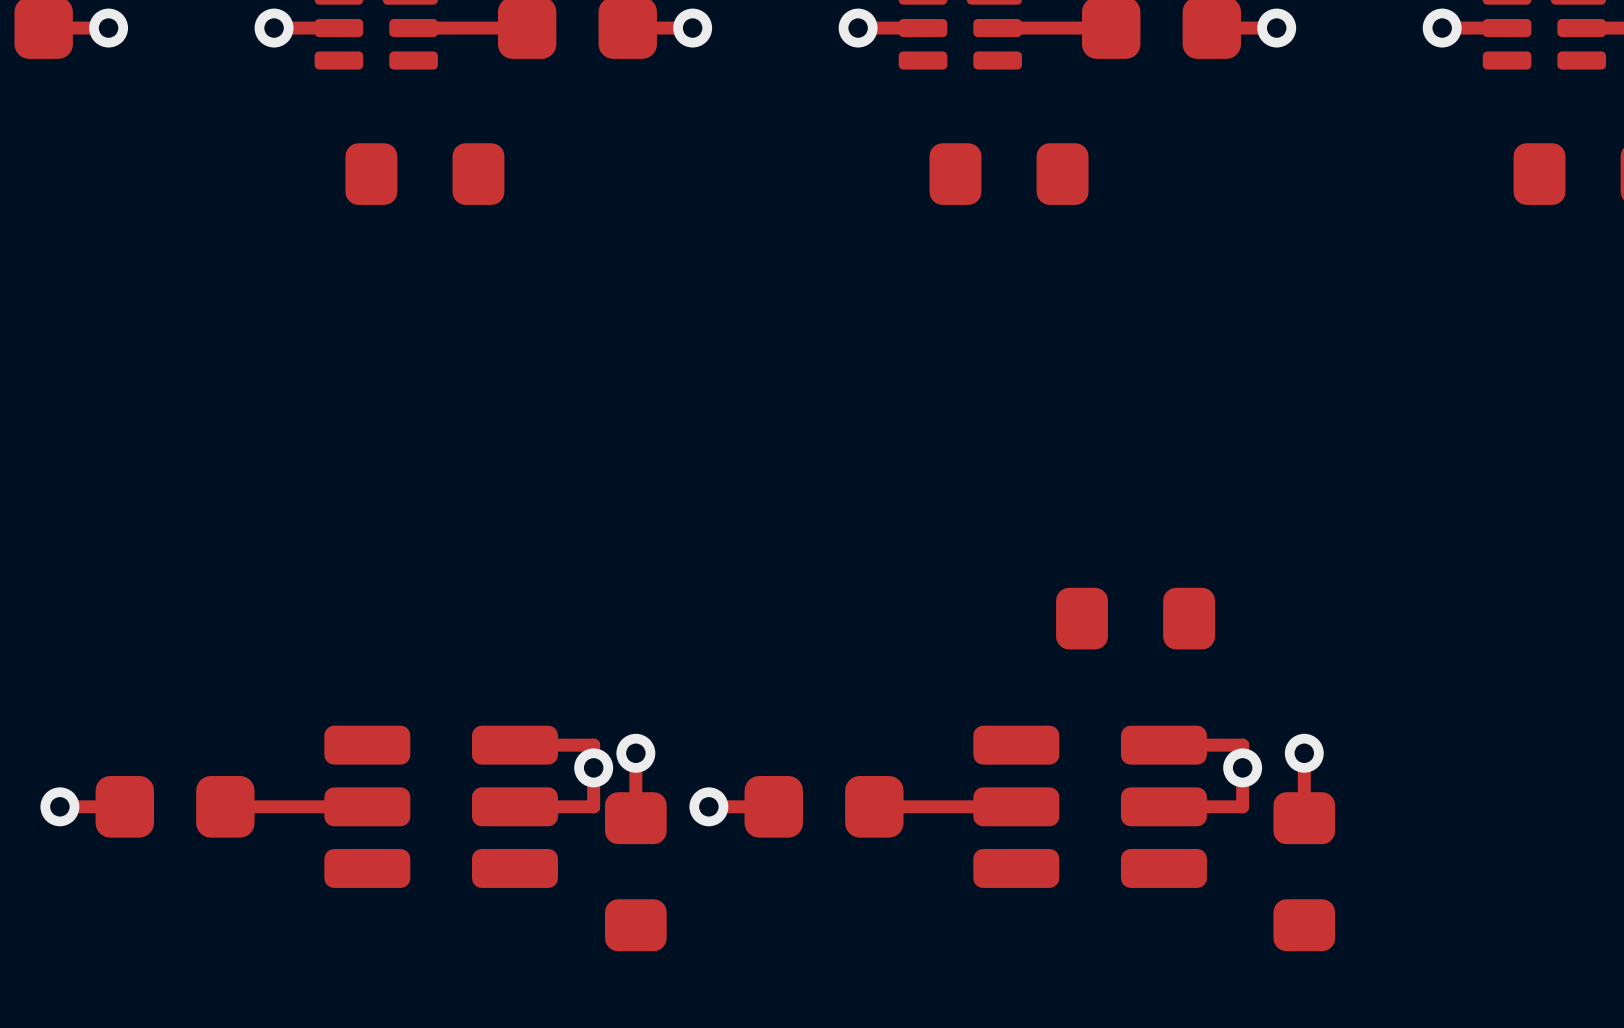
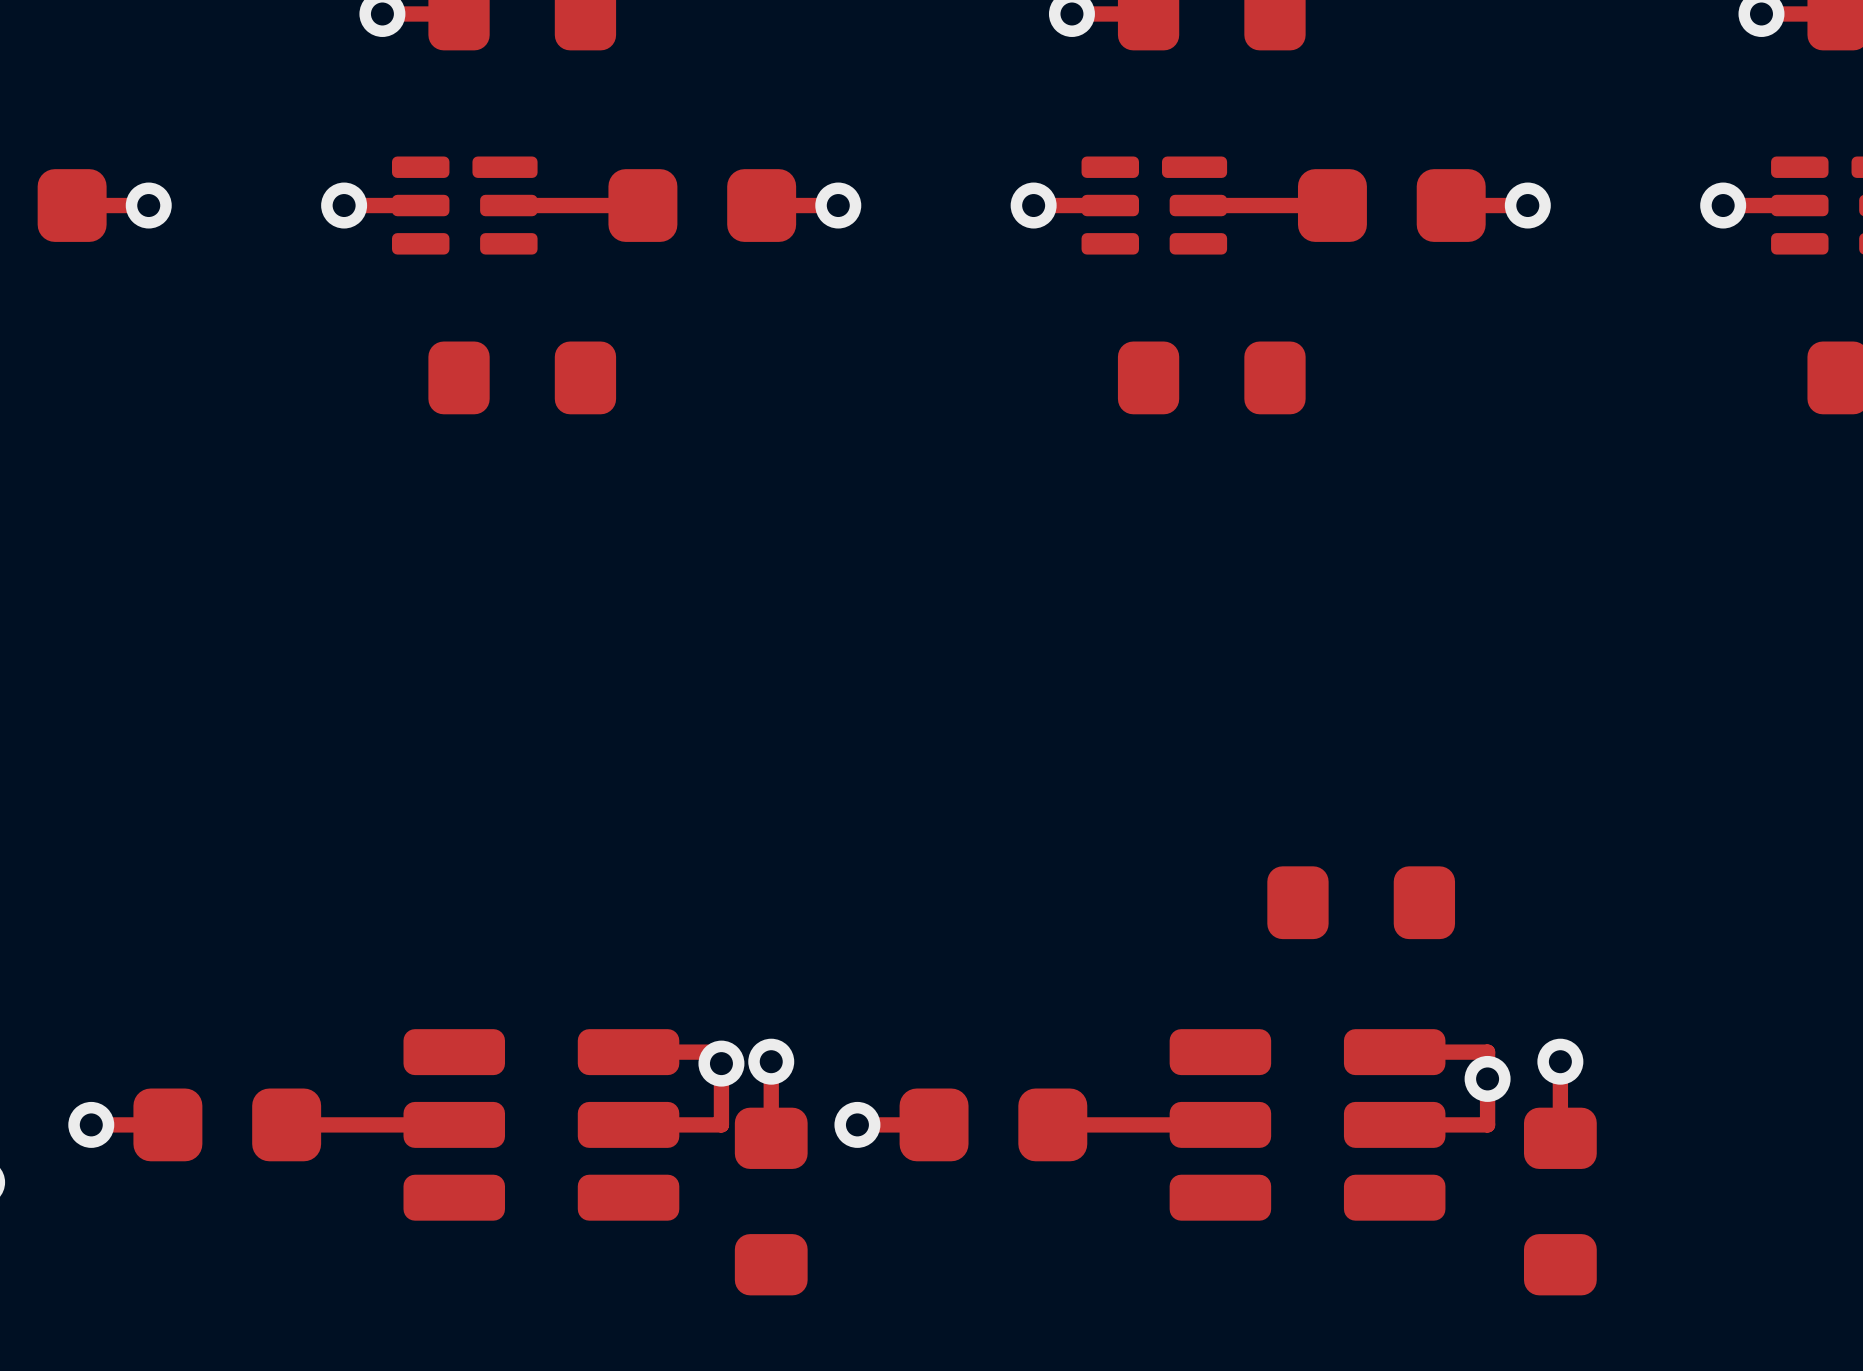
via position: (593, 767) -> (721, 1063)

